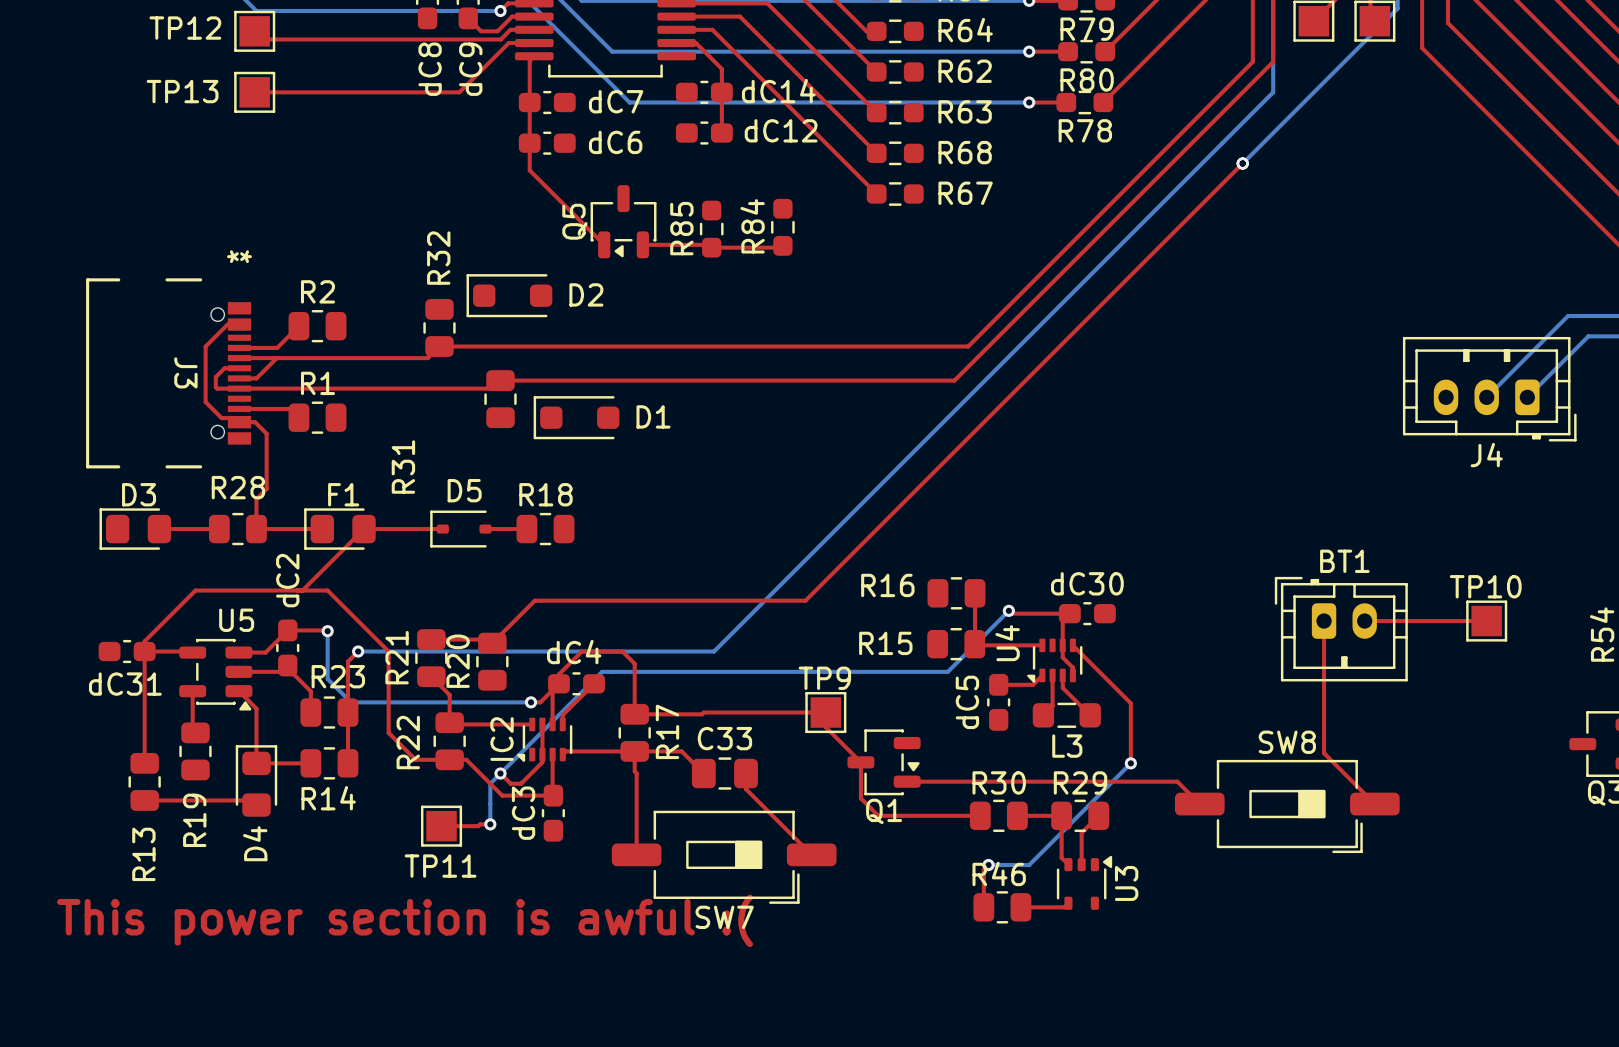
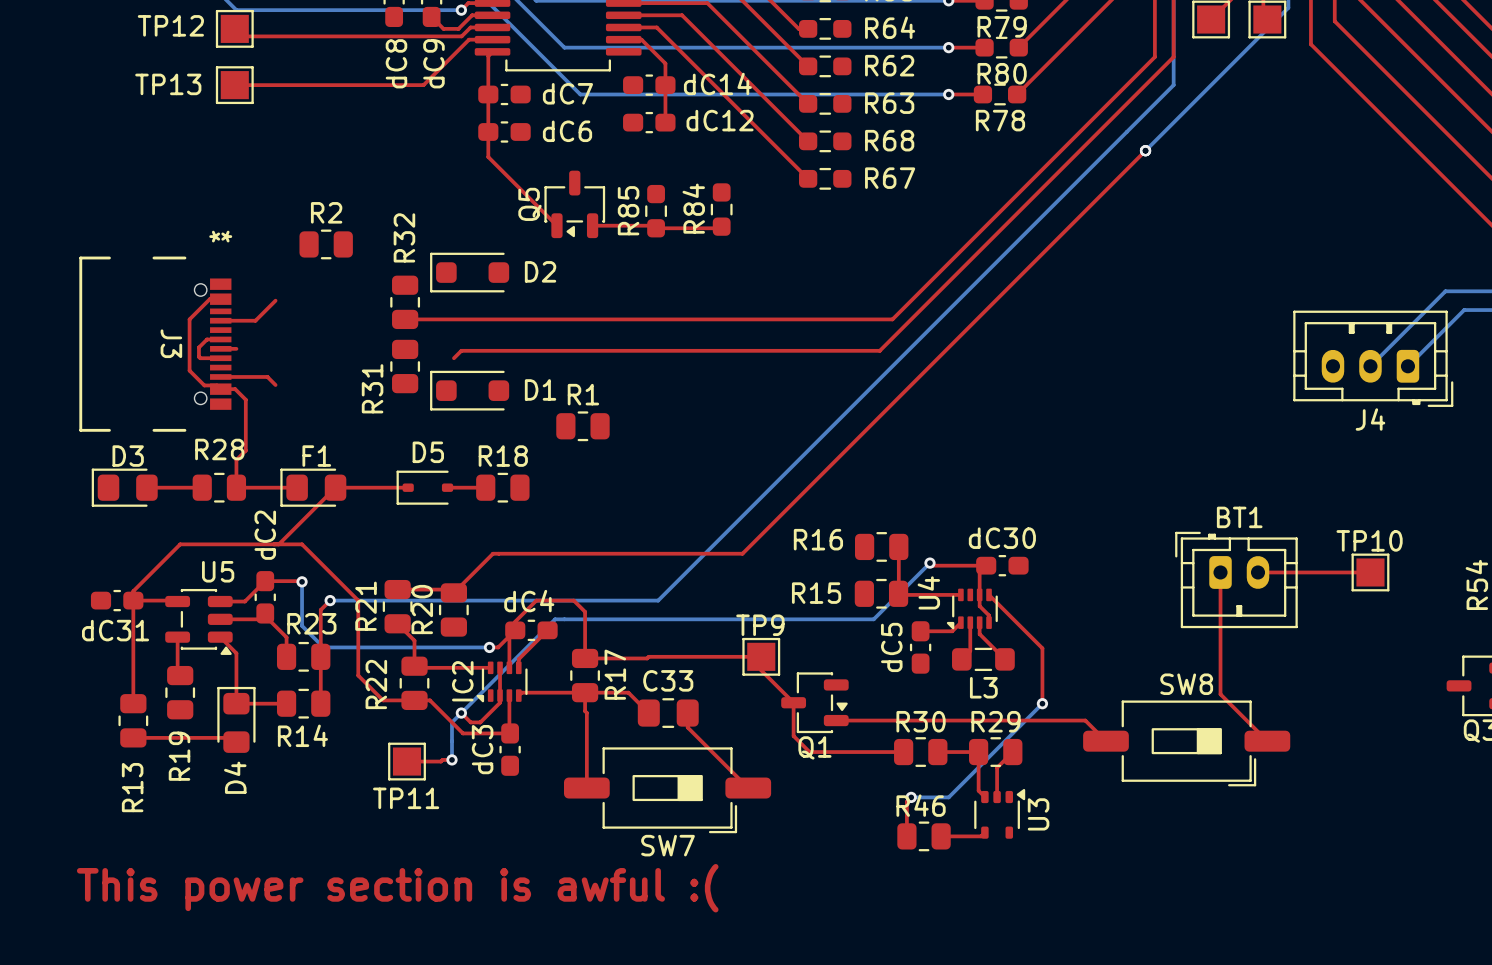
R2 position: (317, 326) -> (326, 244)
top track: (439, 346) (427, 358) (239, 358) -> none
top track: (276, 358) (256, 378) -> none
top track: (239, 388) (492, 388) -> none
R31 position: (500, 399) -> (405, 366)
R1 position: (317, 417) -> (582, 426)
D1 position: (576, 417) -> (469, 390)
R31 name position: R31 (403, 467) -> R31 (372, 388)
text position: This power section is awful :( (405, 920) -> This power section is awful :( (397, 888)

